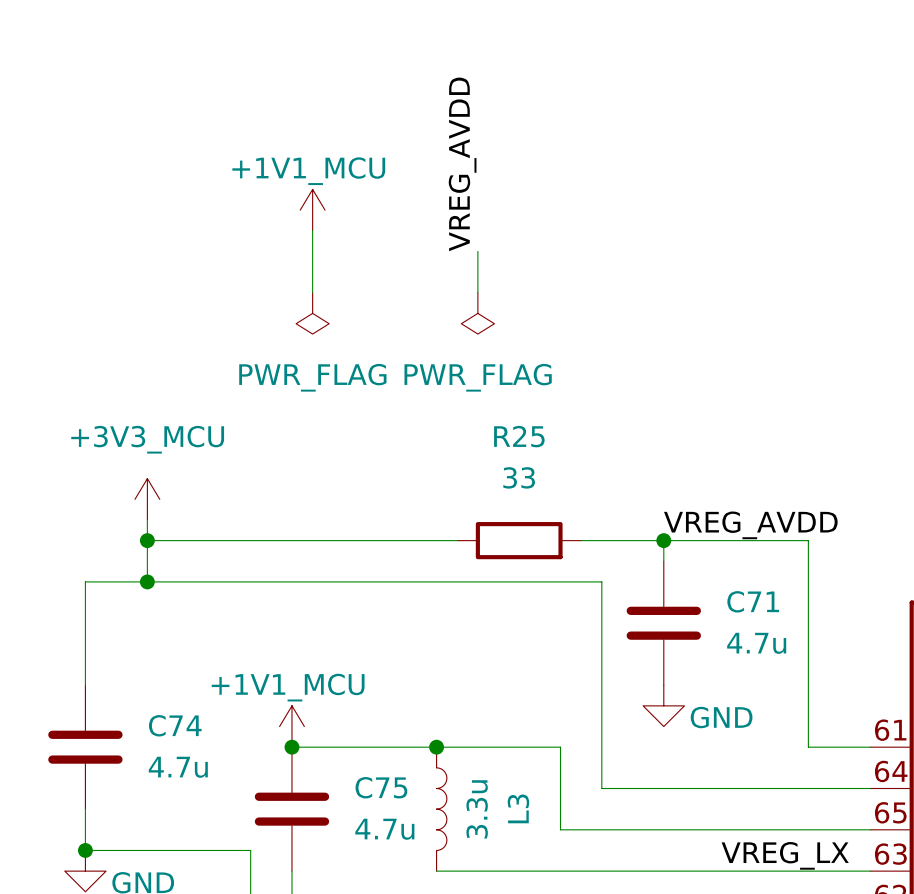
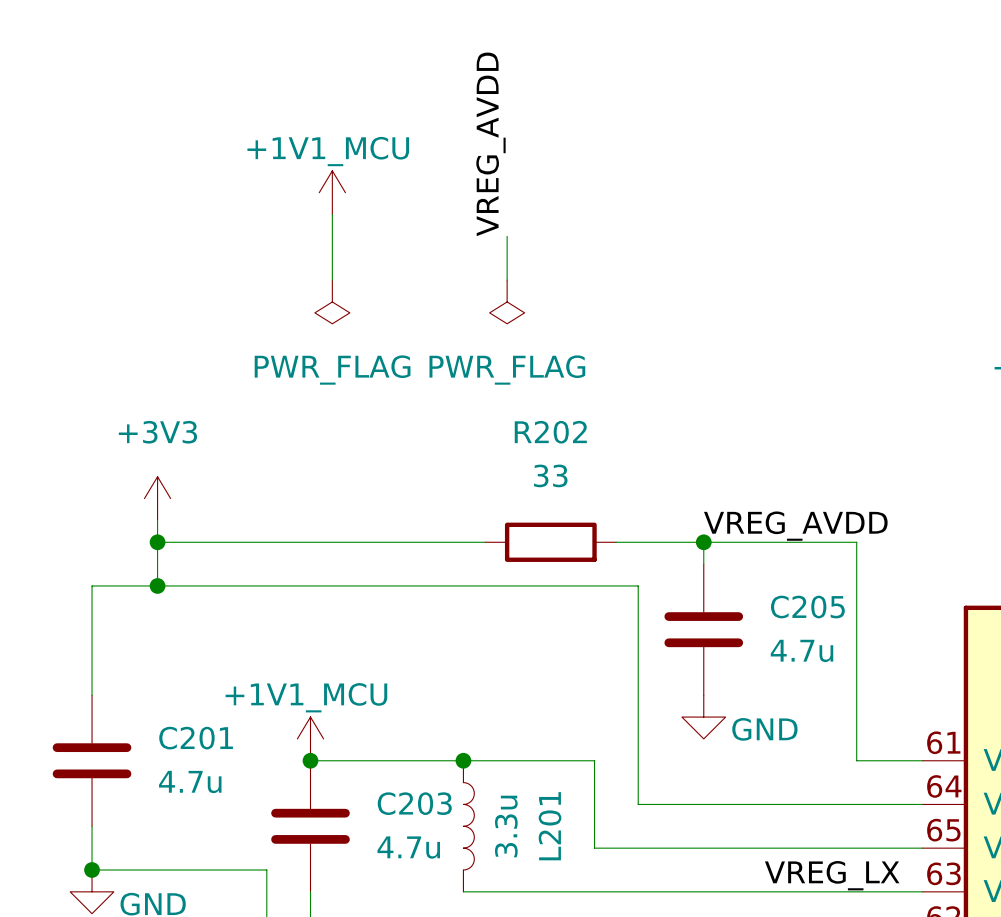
R25 name: R25 (519, 436) -> R202 (550, 432)
power symbol: +3V3_MCU (147, 499) -> +3V3 (157, 498)
C71 name: C71 (753, 601) -> C205 (807, 607)
C74 name: C74 (175, 725) -> C201 (196, 738)
C75 name: C75 (381, 787) -> C203 (414, 803)
L3 name: L3 (518, 808) -> L201 (550, 826)

